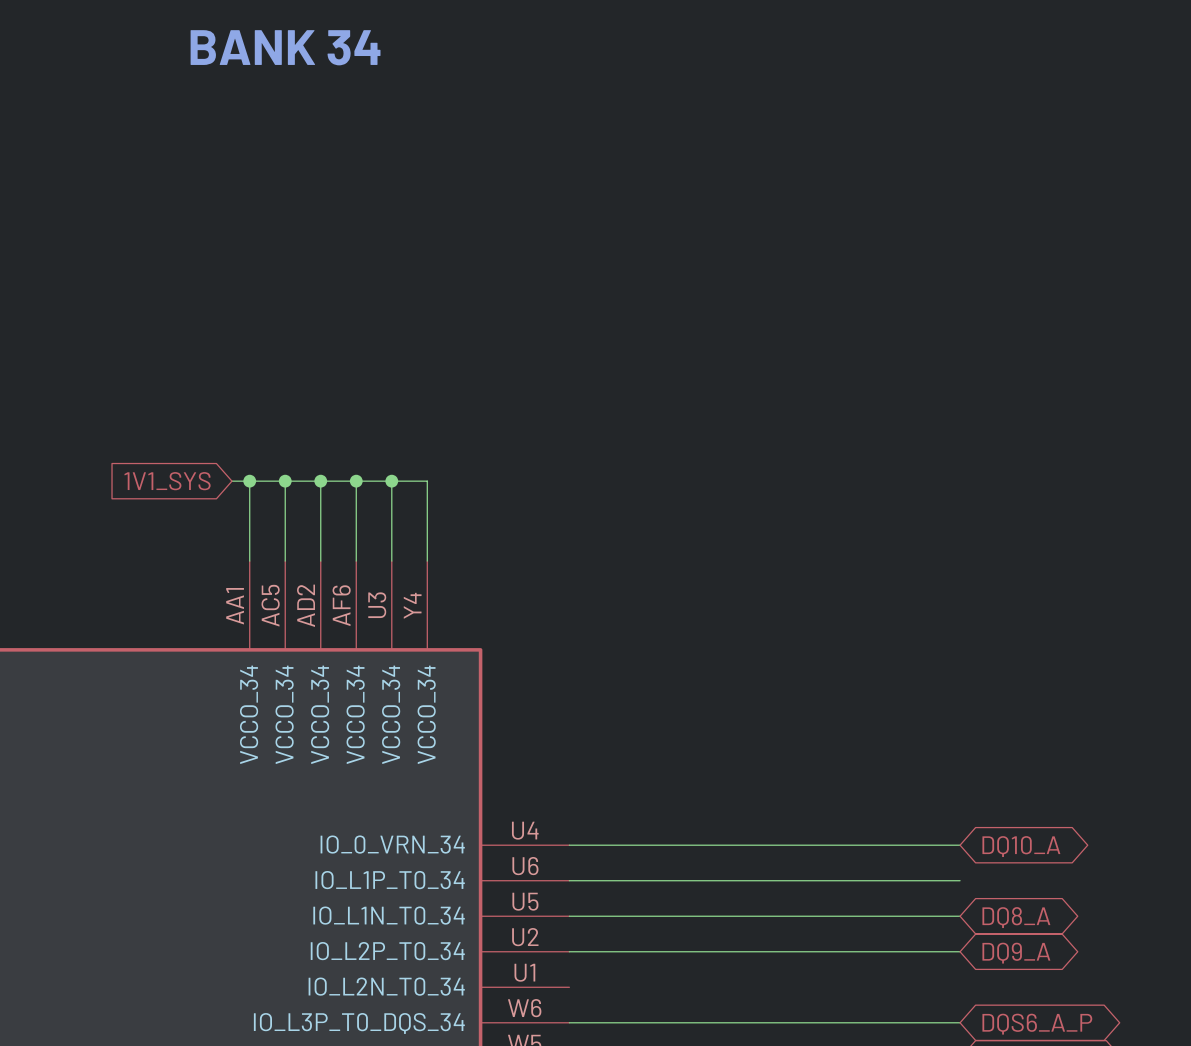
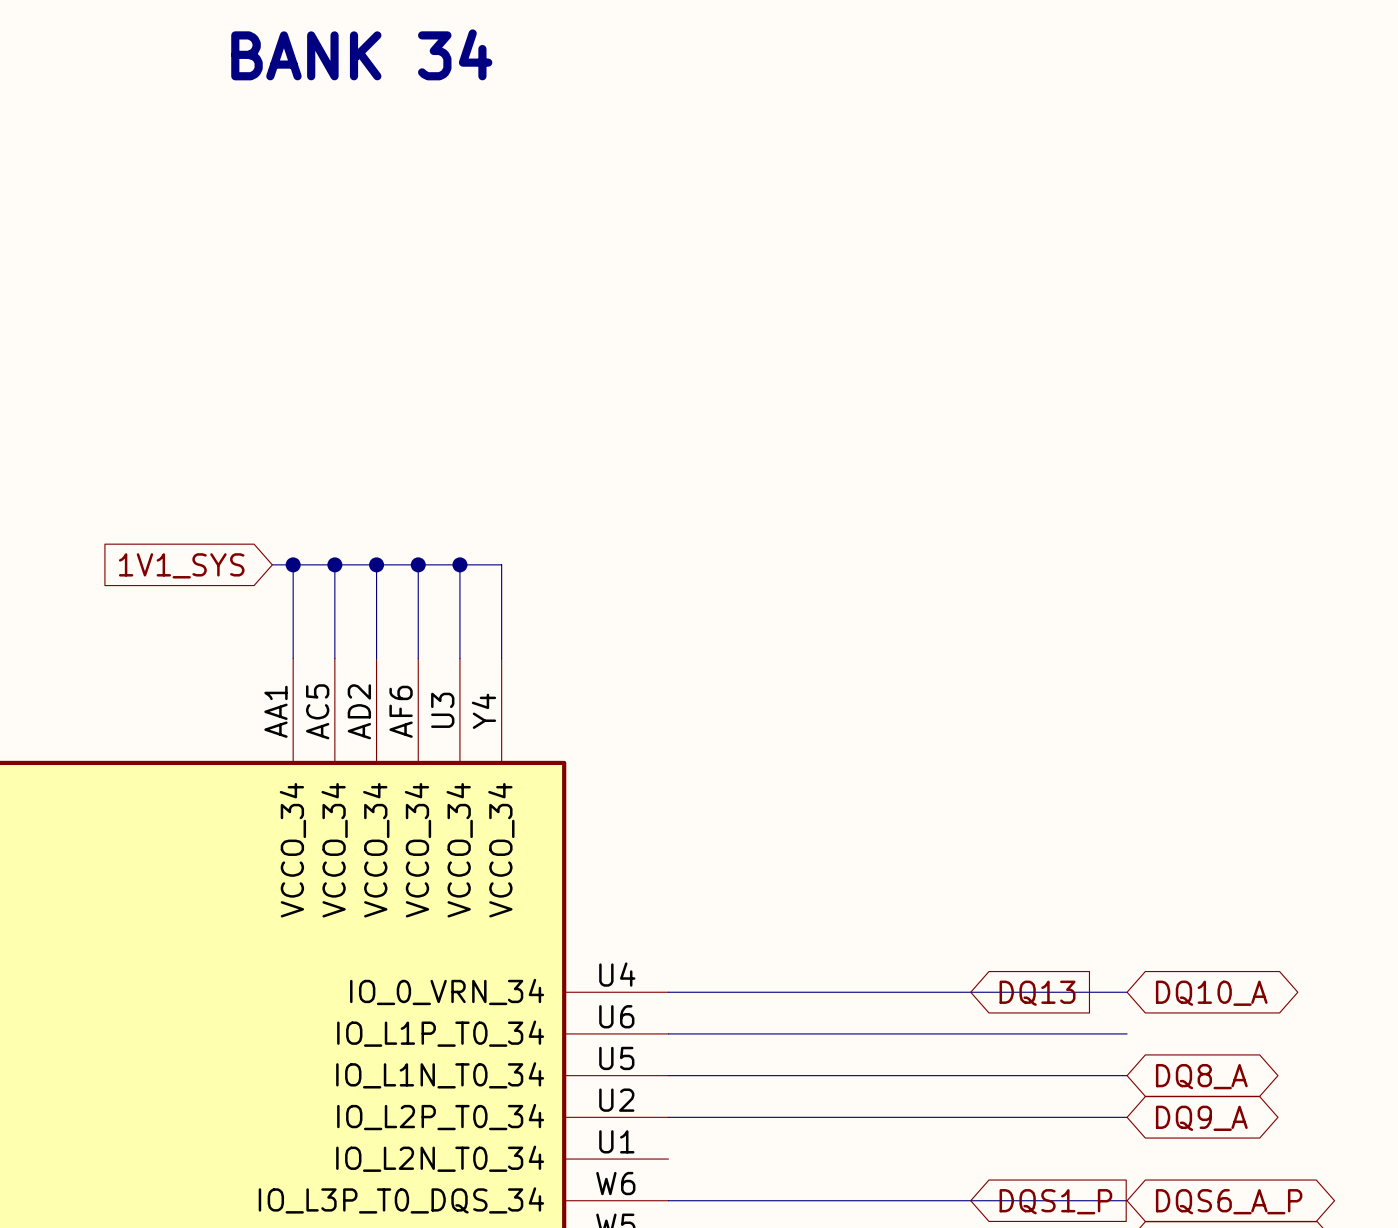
global label: none -> DQ13 (1037, 993)
global label: none -> DQS1_P (1055, 1201)

